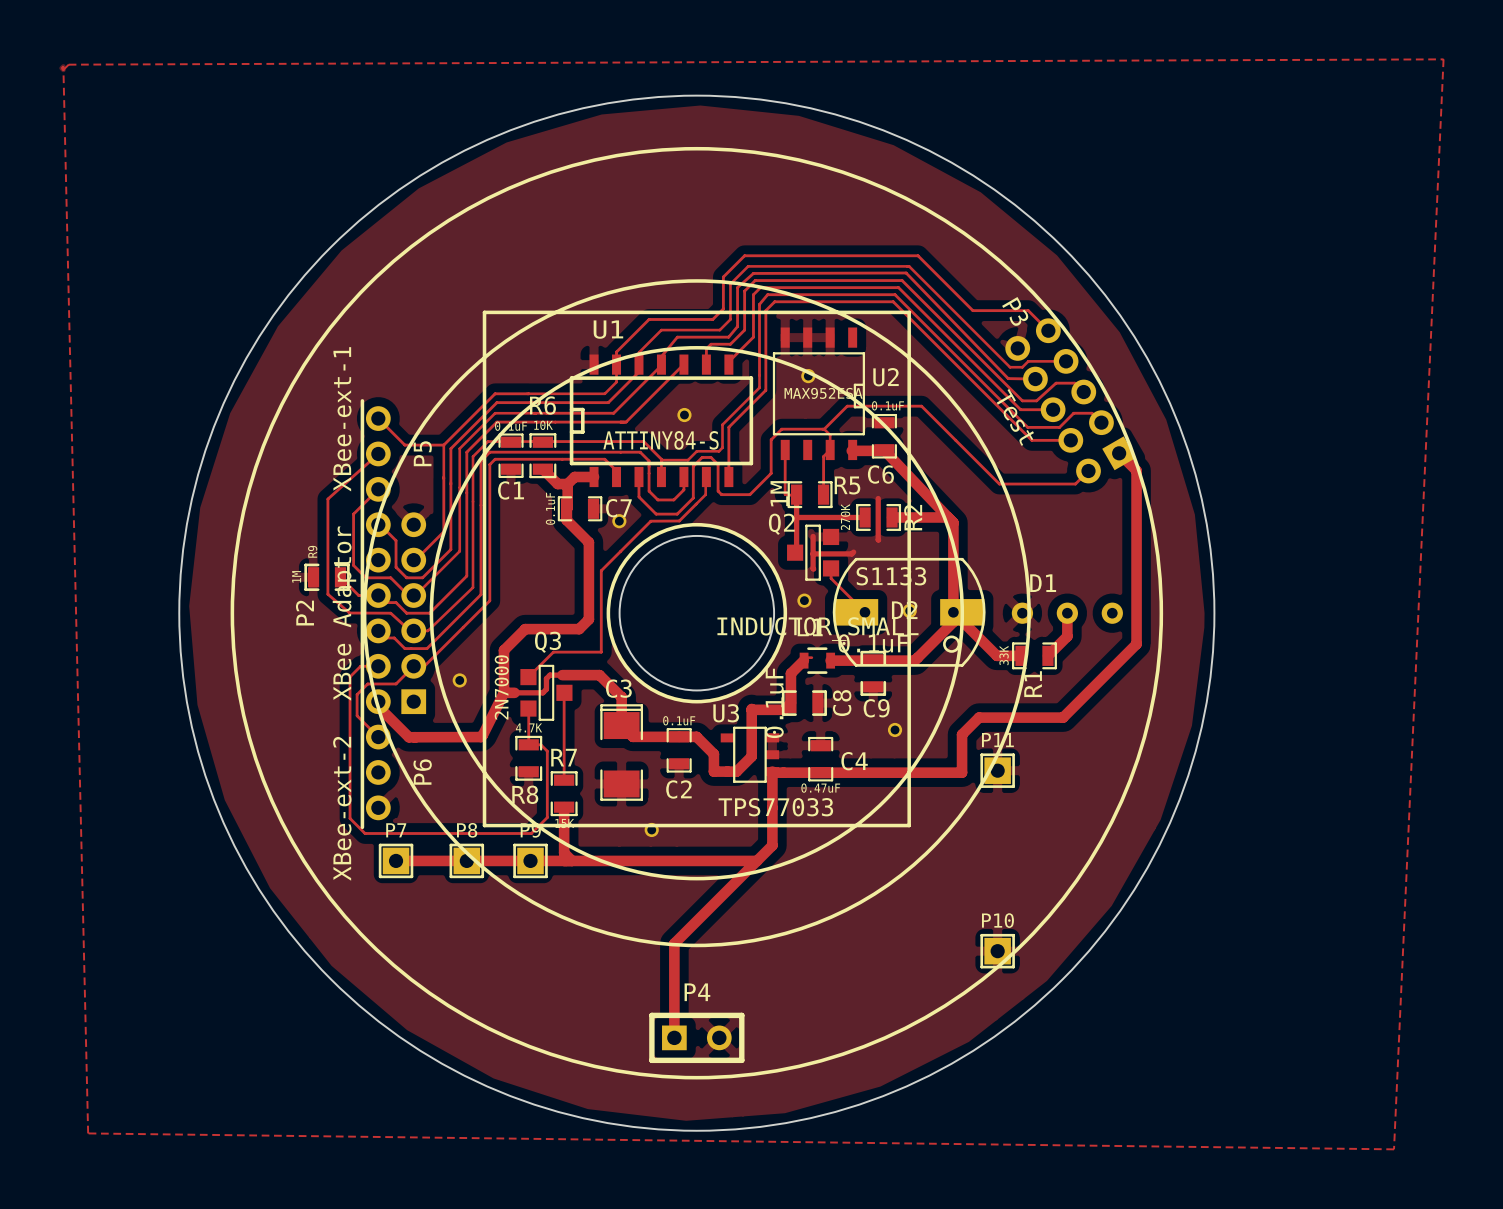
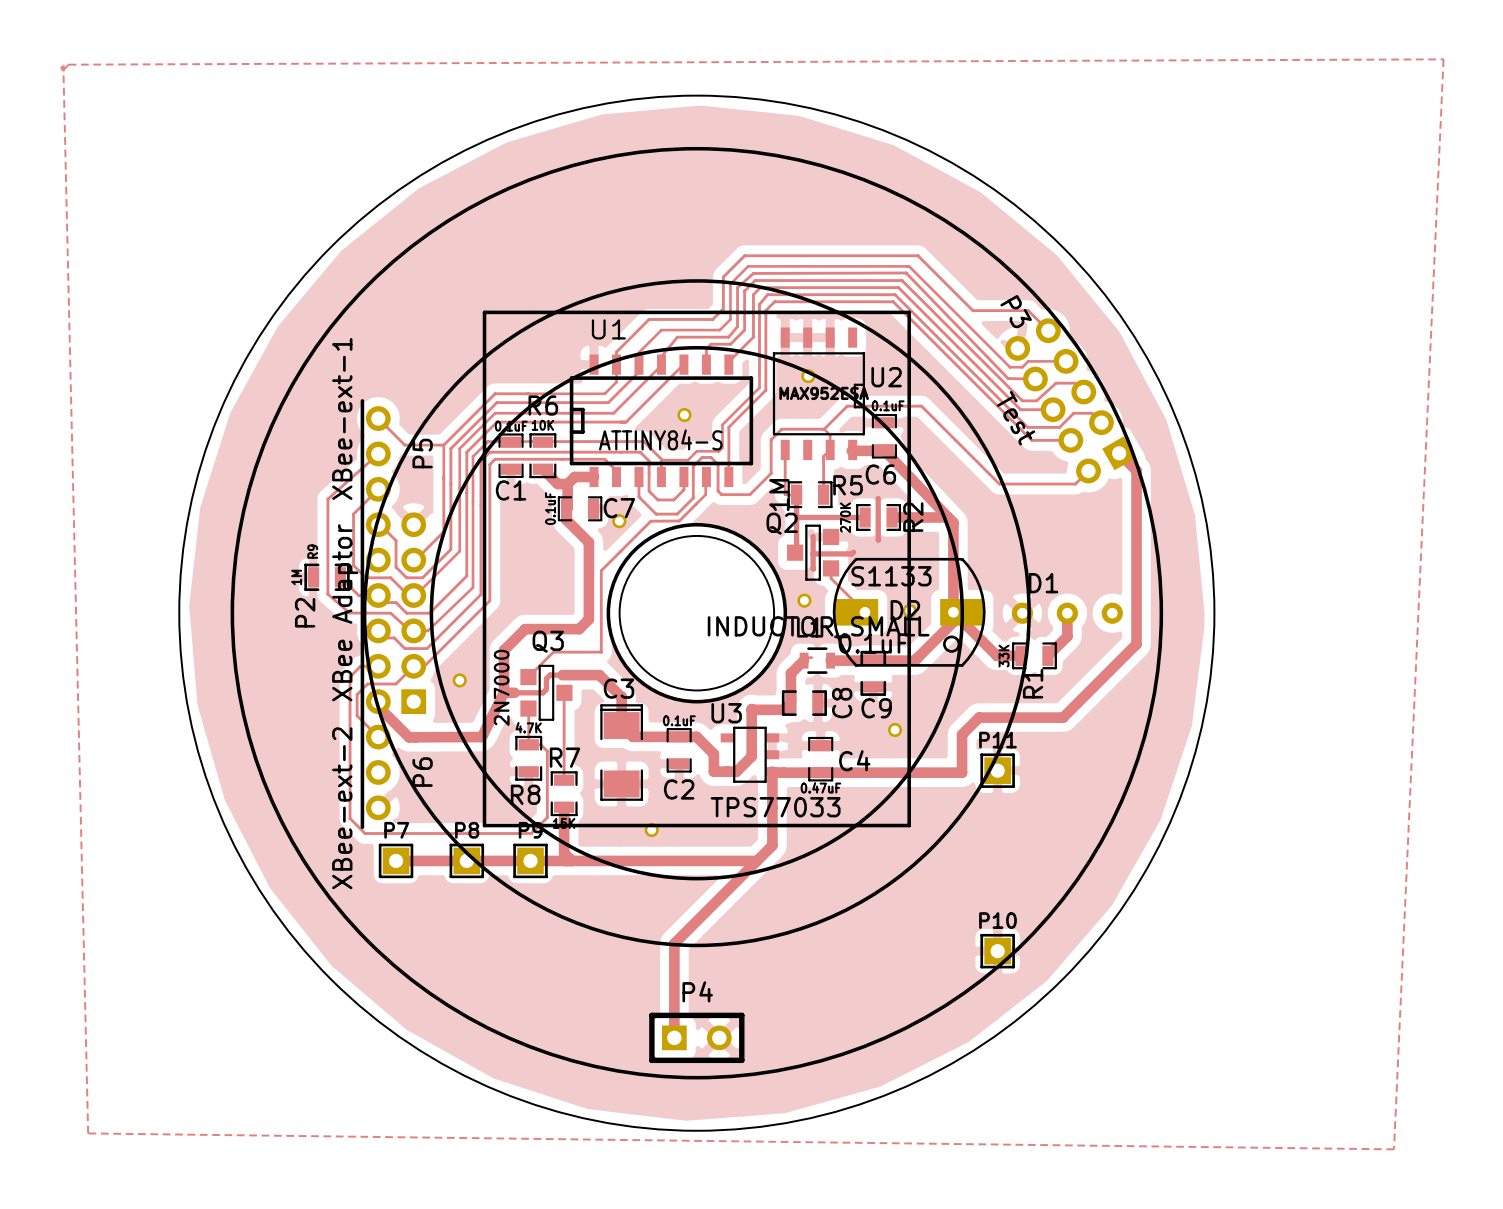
C8 value: 0.1uF (774, 703) -> none

